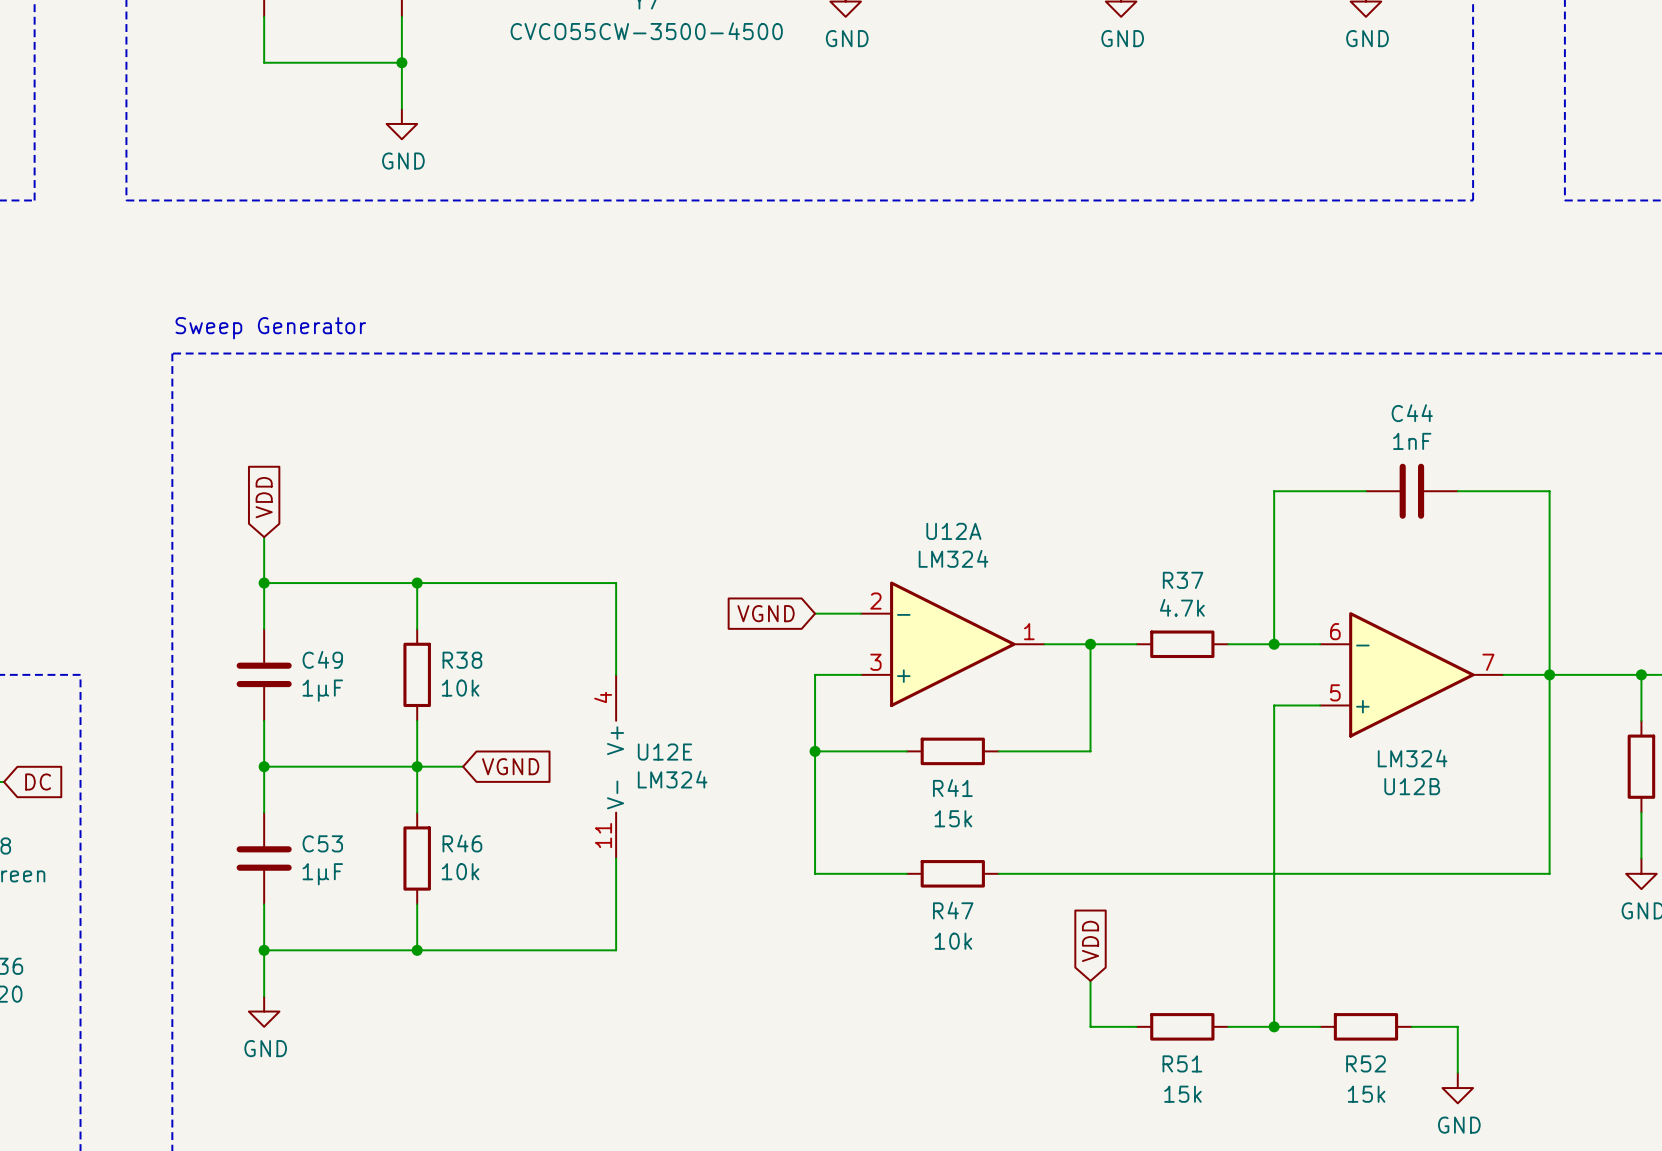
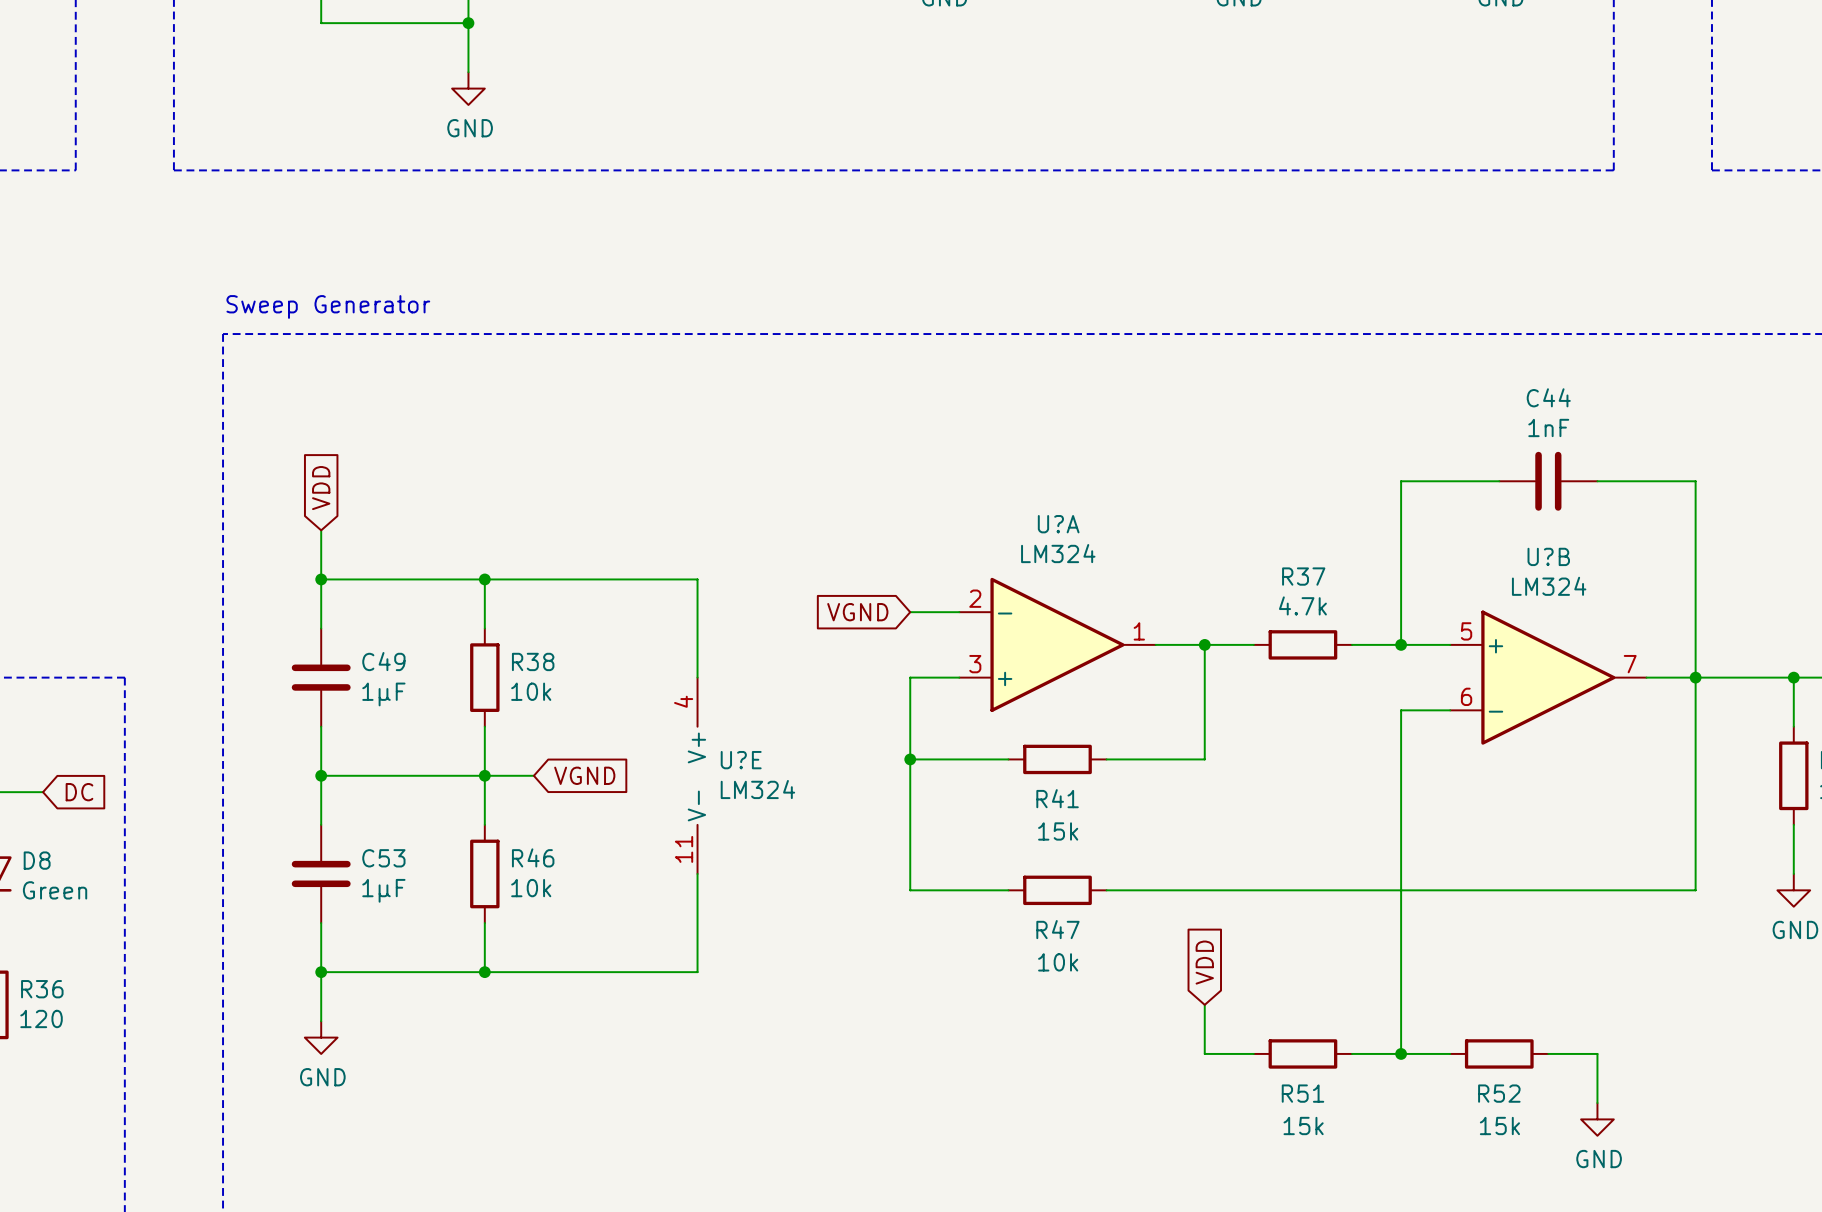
U12A name: U12A (953, 531) -> U?A (1058, 524)
U12B flip: as is (1411, 674) -> up-down (1548, 677)
U12E name: U12E (664, 752) -> U?E (741, 760)
U12B name: U12B (1412, 786) -> U?B (1548, 556)

